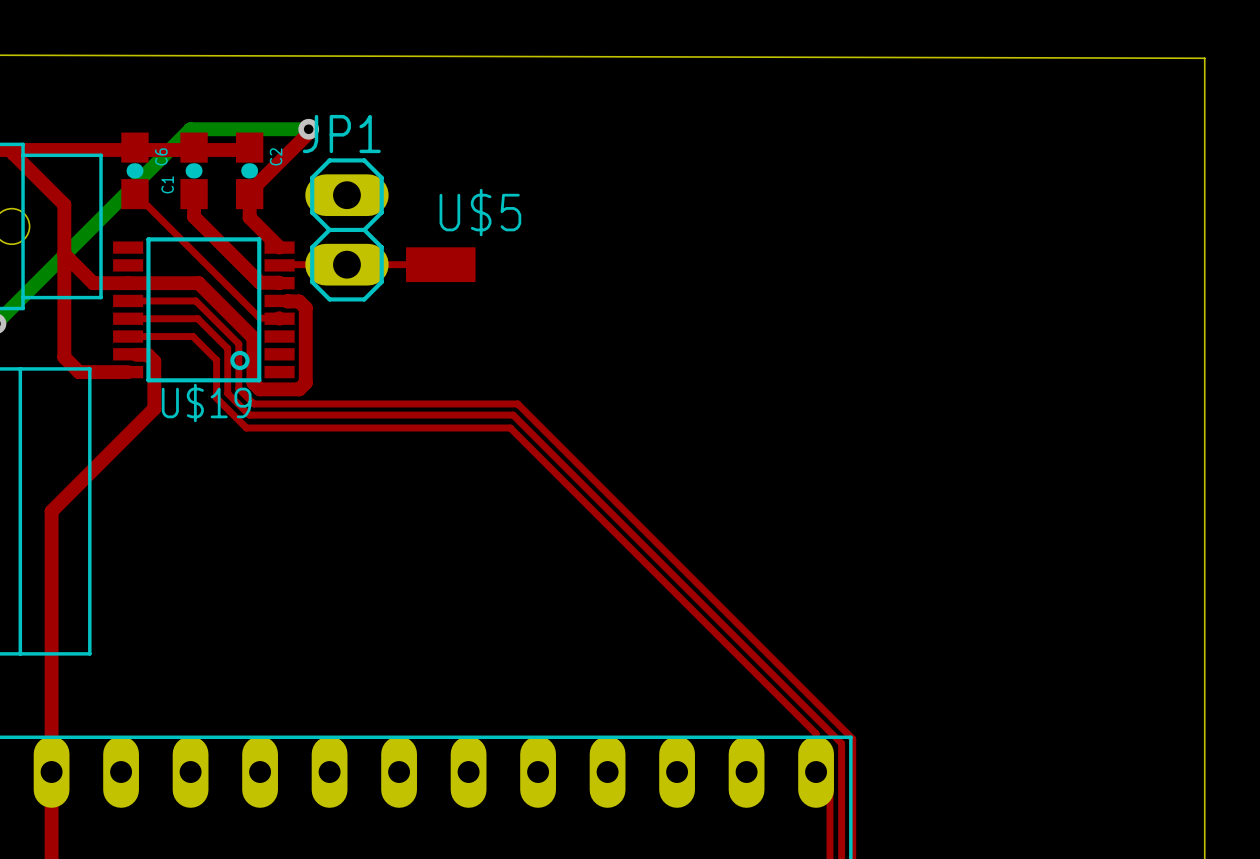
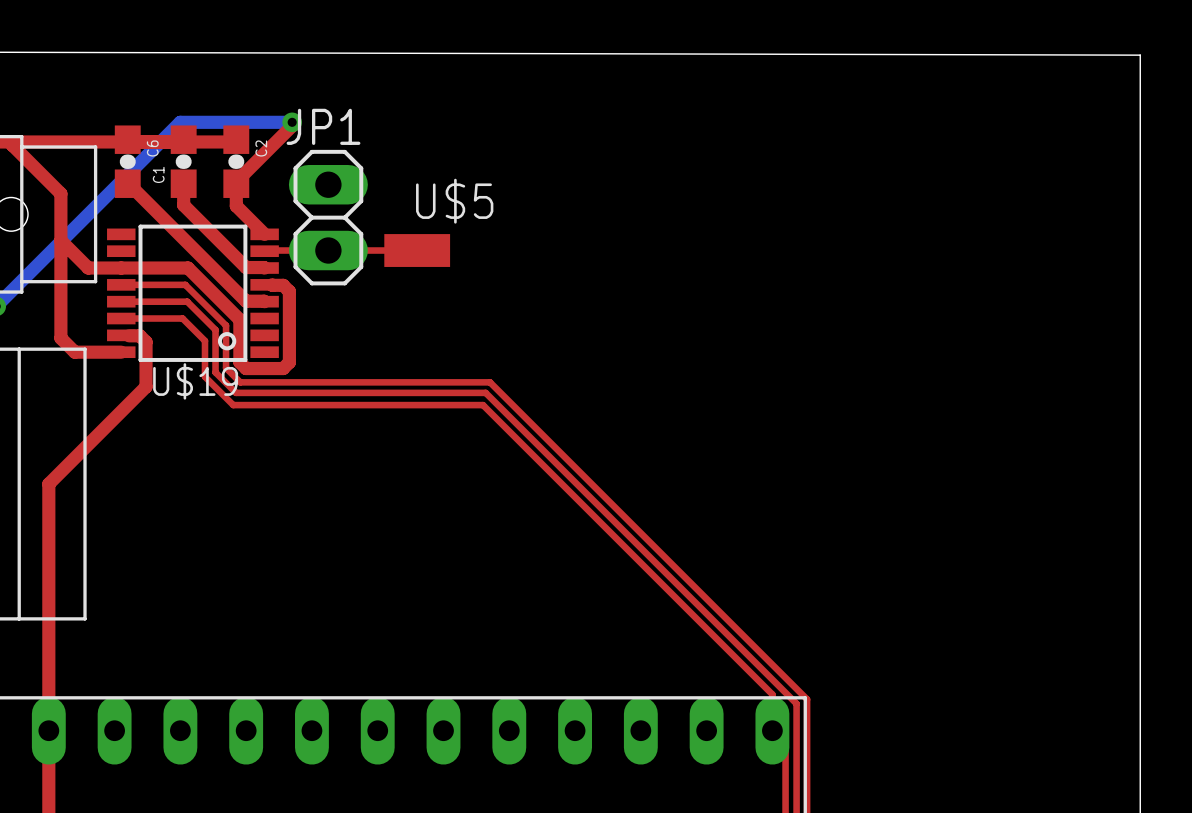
top track width: thin (135, 194) (259, 318) (279, 318) -> thick (128, 183) (246, 301) (264, 301)

